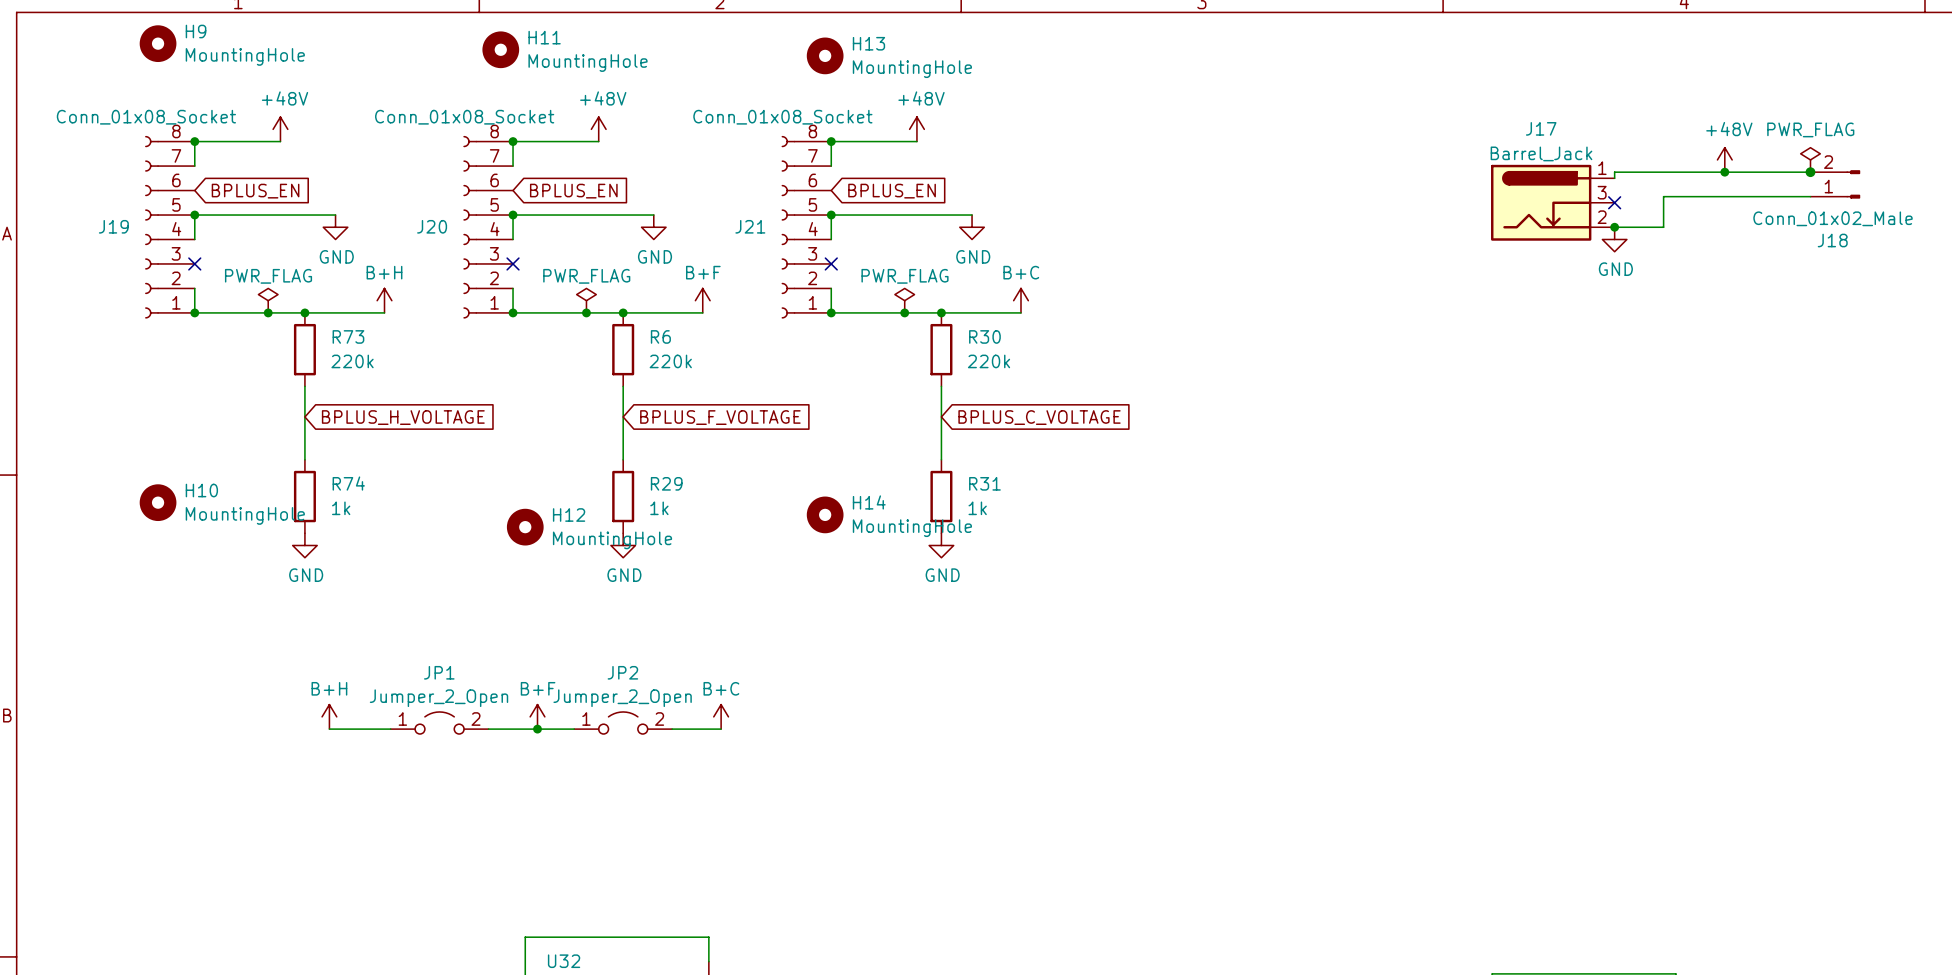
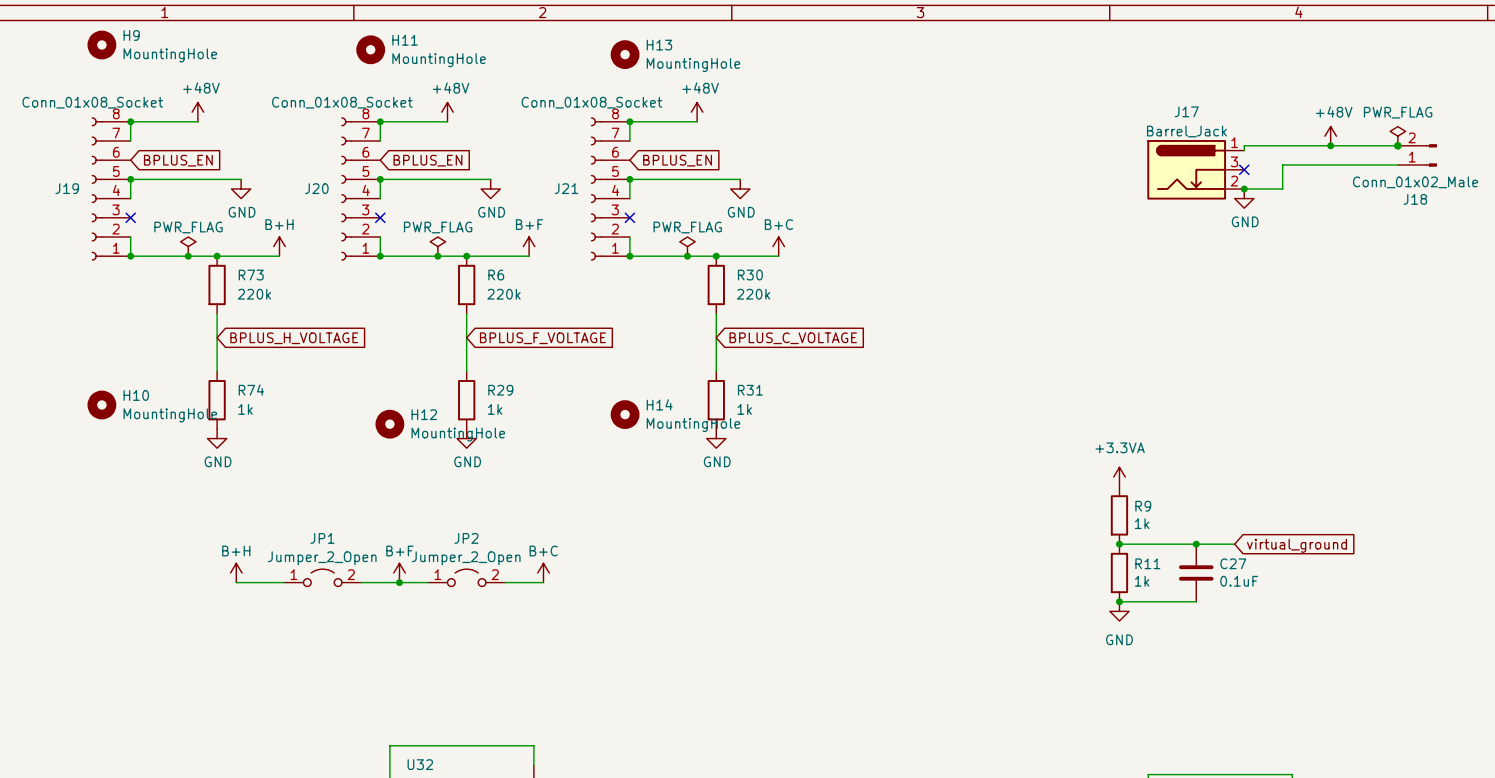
power symbol: none -> +3.3VA (1119, 476)
R9: none -> 1k (1119, 515)
wire: none -> (1119, 544) (1234, 544)
junction: none -> (1119, 544)
junction: none -> (1196, 544)
global label: none -> virtual_ground (1296, 545)
R11: none -> 1k (1119, 572)
C27: none -> 0.1uF (1196, 572)
wire: none -> (1119, 601) (1196, 601)
junction: none -> (1119, 601)
power symbol: none -> GND (1119, 611)

